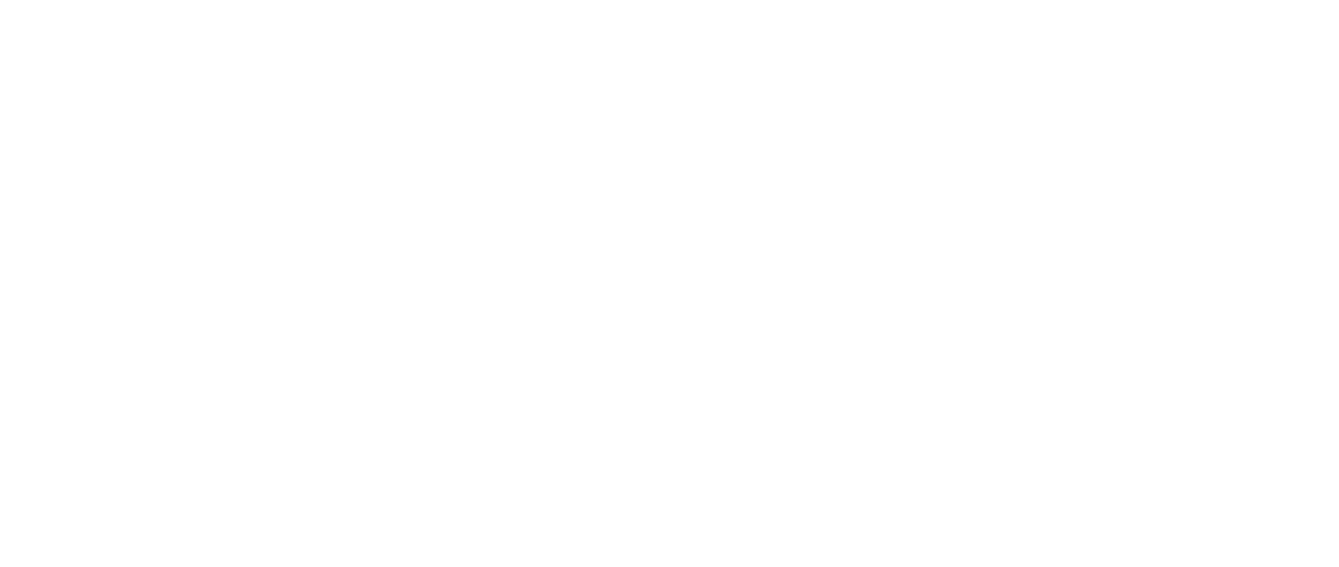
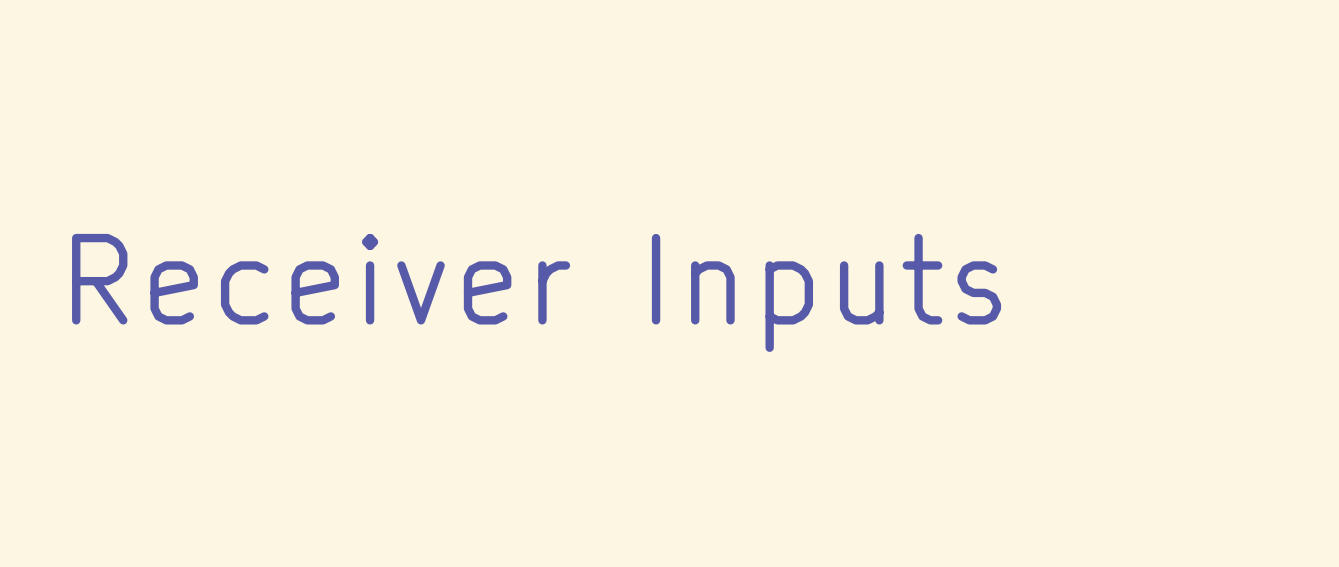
text: none -> Receiver Inputs (536, 292)

